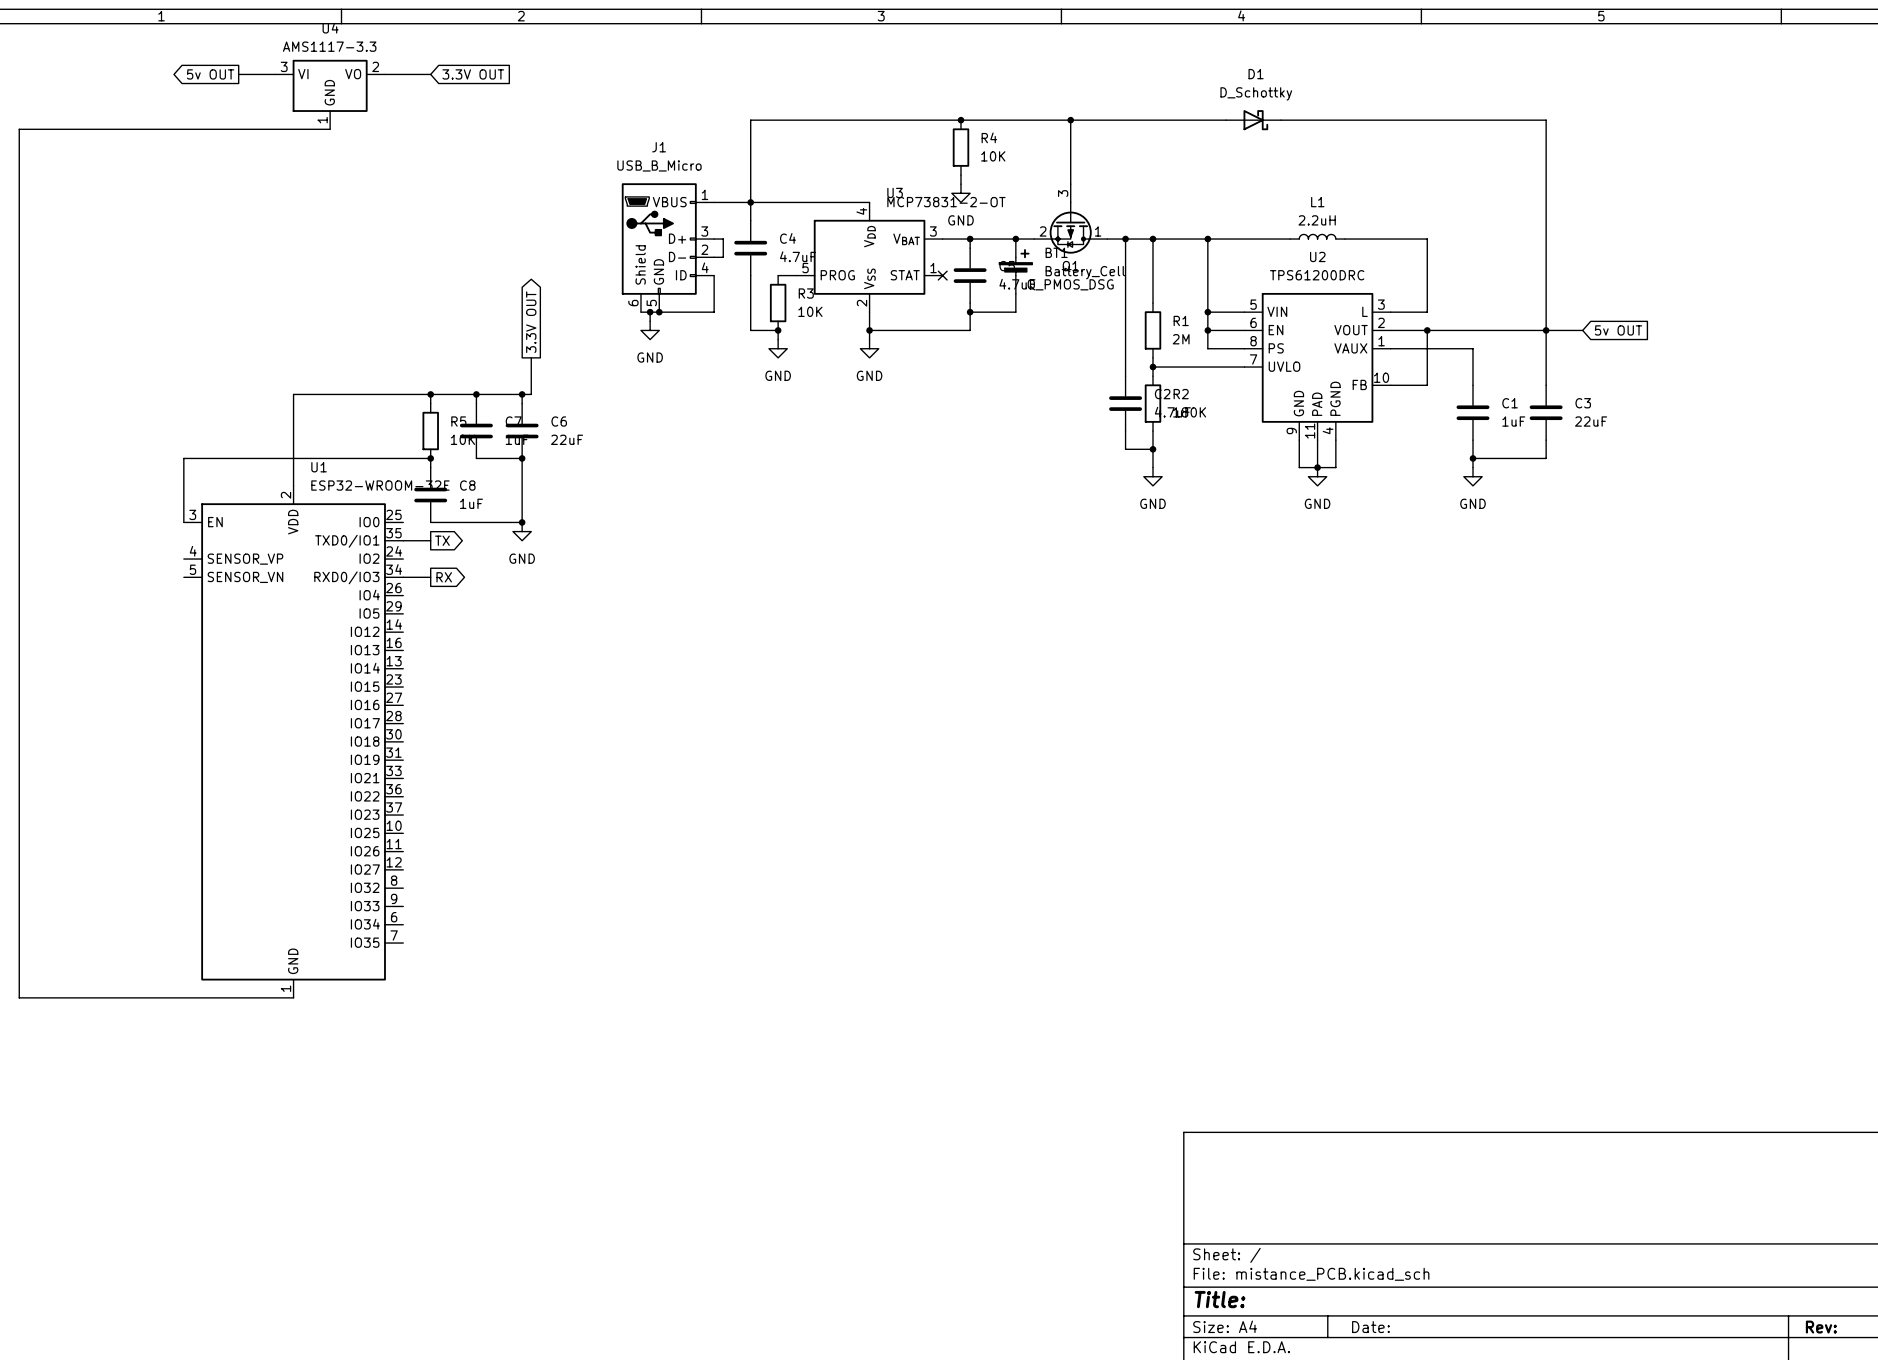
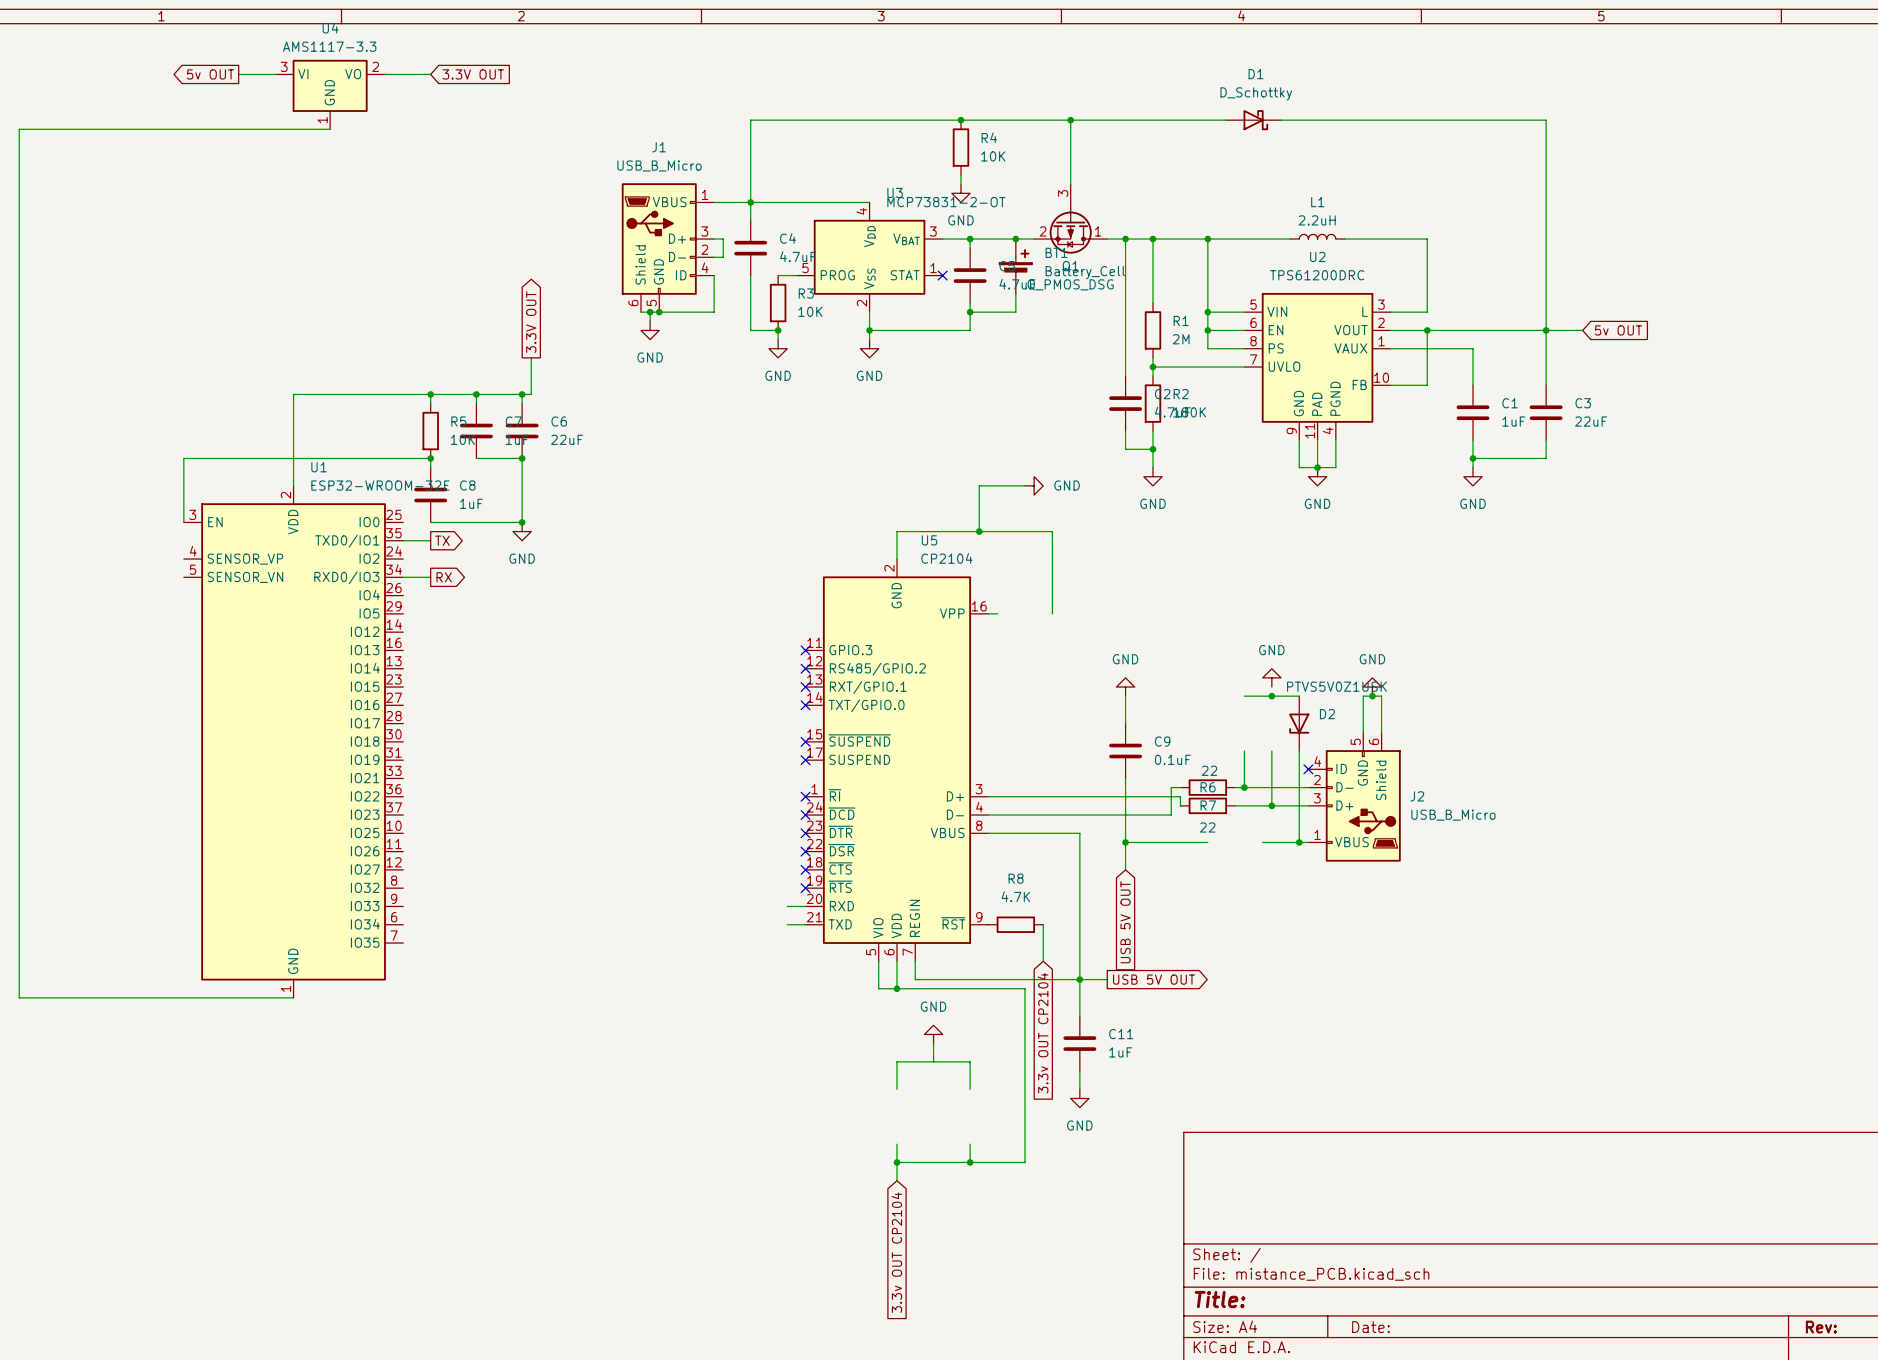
wire: none -> (1024, 485) (979, 485) (979, 531)
power symbol: none -> GND (1034, 485)
junction: none -> (979, 531)
wire: none -> (896, 559) (896, 531) (1052, 531) (1052, 613)
wire: none -> (988, 613) (997, 613)
no-connect mark: none -> (805, 650)
no-connect mark: none -> (805, 668)
power symbol: none -> GND (1271, 677)
no-connect mark: none -> (805, 687)
power symbol: none -> GND (1125, 687)
power symbol: none -> GND (1372, 687)
wire: none -> (1125, 696) (1125, 723)
wire: none -> (1244, 696) (1299, 696)
junction: none -> (1271, 696)
junction: none -> (1372, 696)
no-connect mark: none -> (805, 705)
D2: none -> PTVS5V0Z1USK (1299, 723)
wire: none -> (1363, 732) (1363, 696) (1381, 696) (1381, 732)
no-connect mark: none -> (805, 741)
C9: none -> 0.1uF (1125, 751)
wire: none -> (1244, 751) (1244, 787)
wire: none -> (1271, 751) (1271, 805)
wire: none -> (1299, 751) (1299, 842)
no-connect mark: none -> (805, 760)
U5: none -> CP2104 (896, 760)
no-connect mark: none -> (1308, 769)
wire: none -> (1125, 778) (1125, 869)
wire: none -> (1180, 787) (1171, 787) (1171, 815) (988, 815)
R6: none -> 22 (1207, 787)
wire: none -> (1235, 787) (1308, 787)
junction: none -> (1244, 787)
no-connect mark: none -> (805, 796)
wire: none -> (988, 796) (1180, 796) (1180, 805)
J2: none -> USB_B_Micro (1354, 797)
R7: none -> 22 (1207, 805)
wire: none -> (1235, 805) (1308, 805)
junction: none -> (1271, 805)
no-connect mark: none -> (805, 815)
no-connect mark: none -> (805, 833)
wire: none -> (988, 833) (1079, 833) (1079, 1016)
wire: none -> (1125, 842) (1207, 842)
junction: none -> (1125, 842)
wire: none -> (1262, 842) (1308, 842)
junction: none -> (1299, 842)
no-connect mark: none -> (805, 851)
no-connect mark: none -> (805, 869)
no-connect mark: none -> (805, 888)
wire: none -> (787, 906) (805, 906)
global label: none -> USB 5V OUT (1125, 922)
wire: none -> (787, 924) (805, 924)
R8: none -> 4.7K (1015, 924)
wire: none -> (1043, 924) (1043, 961)
wire: none -> (878, 961) (878, 988) (1024, 988) (1024, 1162) (896, 1162)
wire: none -> (896, 961) (896, 988)
wire: none -> (915, 961) (915, 979) (1107, 979)
junction: none -> (1079, 979)
global label: none -> USB 5V OUT (1154, 979)
junction: none -> (896, 988)
global label: none -> 3.3v OUT CP2104 (1043, 1033)
power symbol: none -> GND (933, 1034)
wire: none -> (933, 1043) (933, 1061)
C11: none -> 1uF (1079, 1043)
wire: none -> (1079, 1071) (1079, 1089)
wire: none -> (896, 1089) (896, 1061) (970, 1061) (970, 1089)
power symbol: none -> GND (1079, 1098)
wire: none -> (896, 1144) (896, 1180)
wire: none -> (970, 1144) (970, 1162)
junction: none -> (896, 1162)
junction: none -> (970, 1162)
global label: none -> 3.3v OUT CP2104 (896, 1252)

